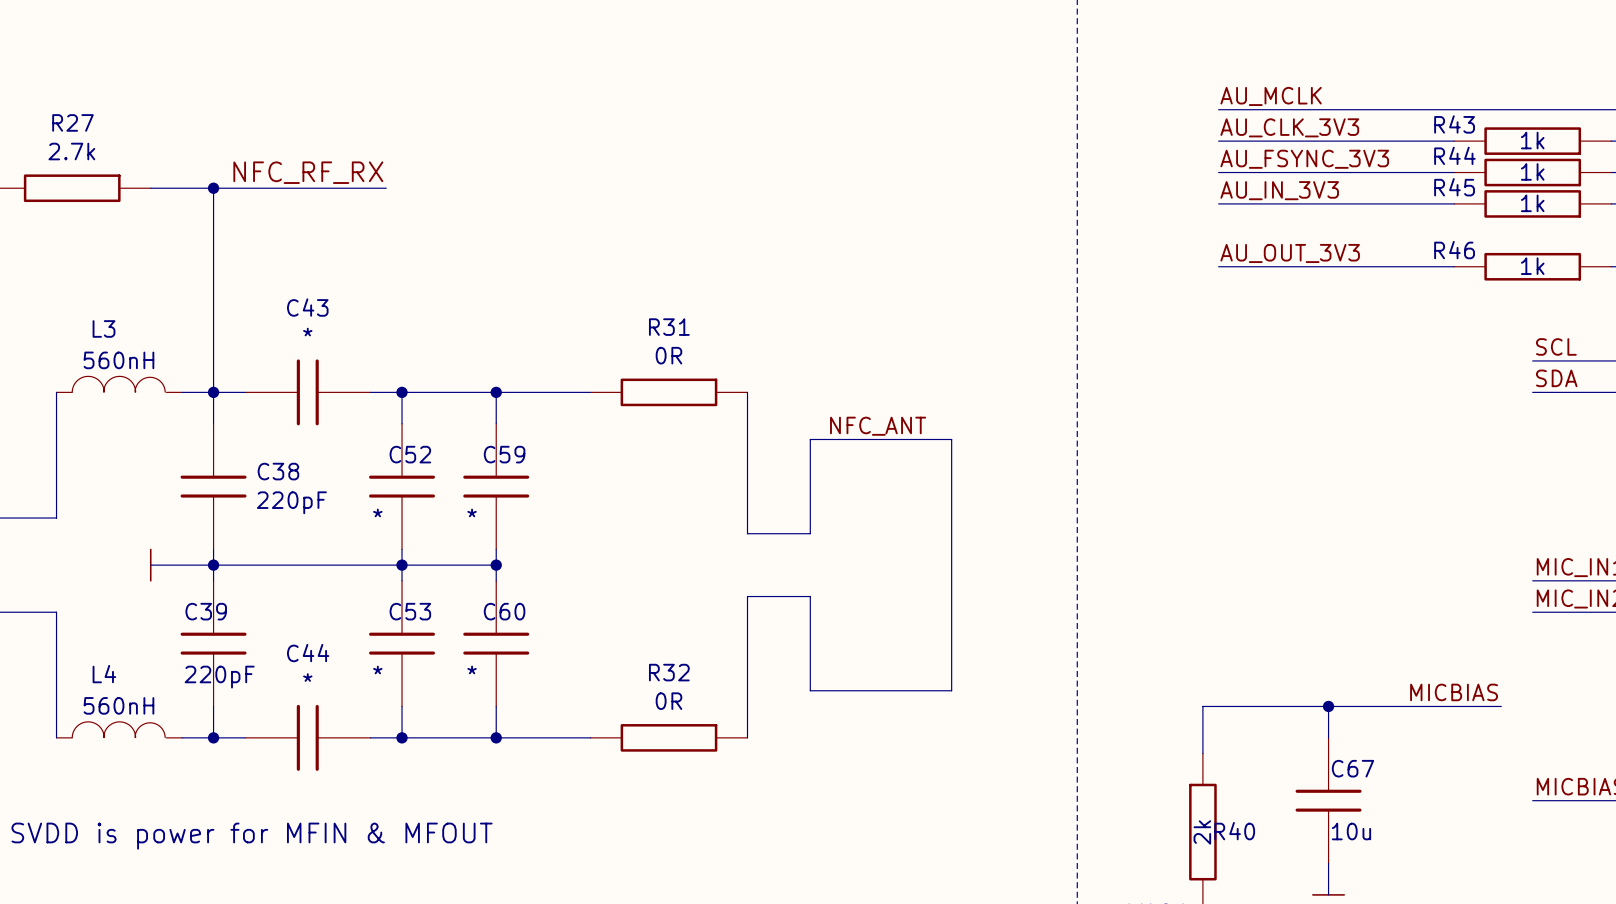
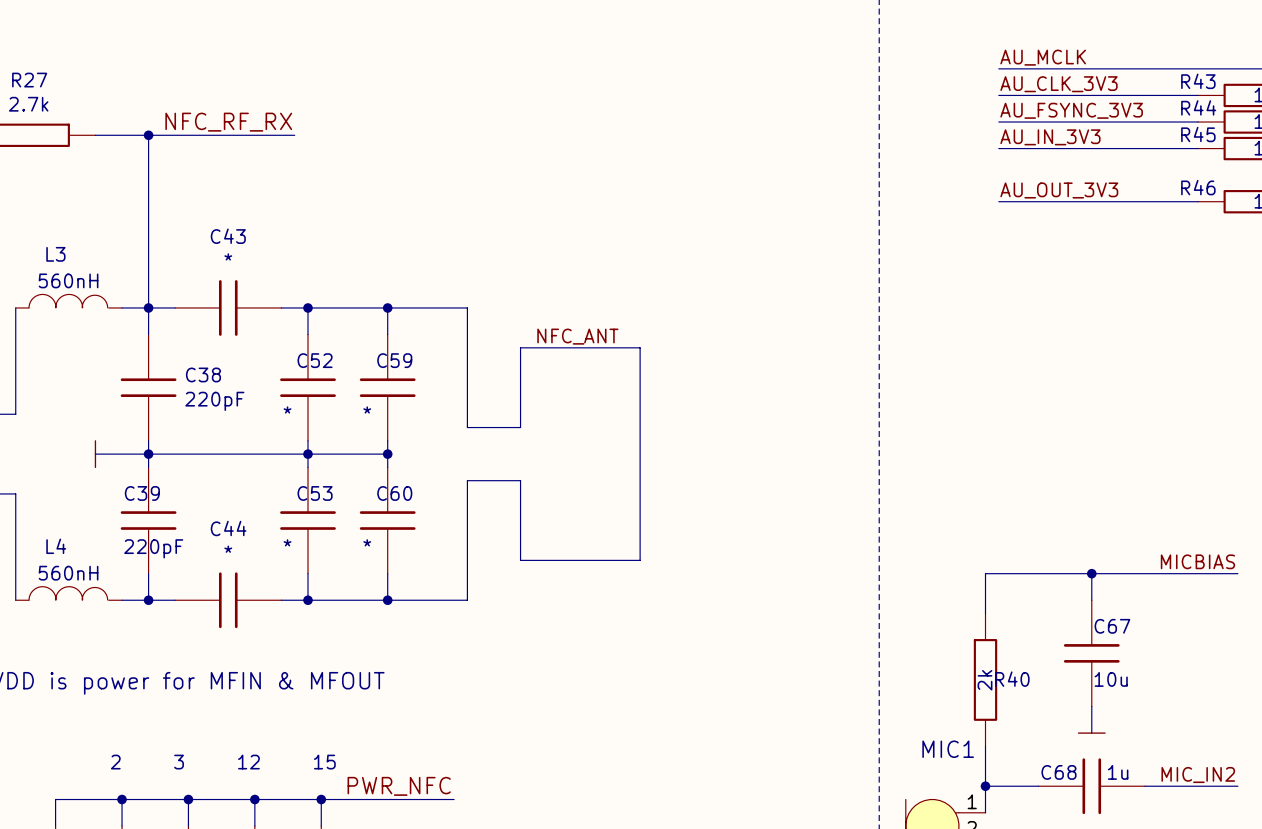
R31: 0R (668, 392) -> none
wire: (747, 392) (747, 533) (810, 533) (810, 439) (951, 439) (951, 690) (810, 690) (810, 596) (747, 596) (747, 737) -> (467, 307) (467, 427) (520, 427) (520, 347) (640, 347) (640, 560) (520, 560) (520, 480) (467, 480) (467, 600)
label position: NFC_ANT (878, 426) -> NFC_ANT (577, 336)
R32: 0R (668, 737) -> none

